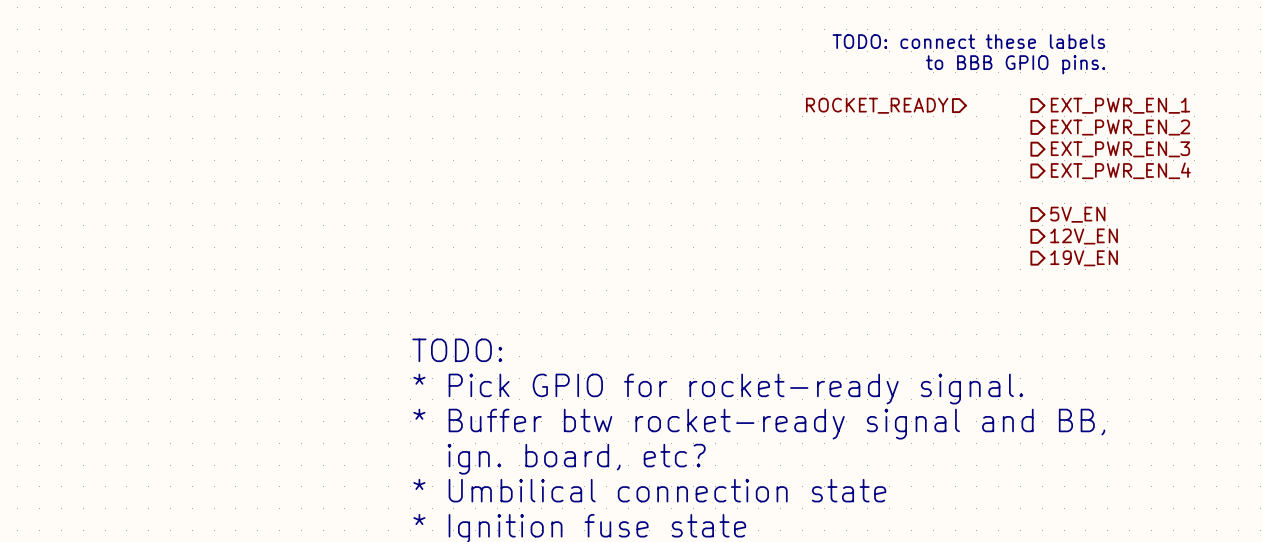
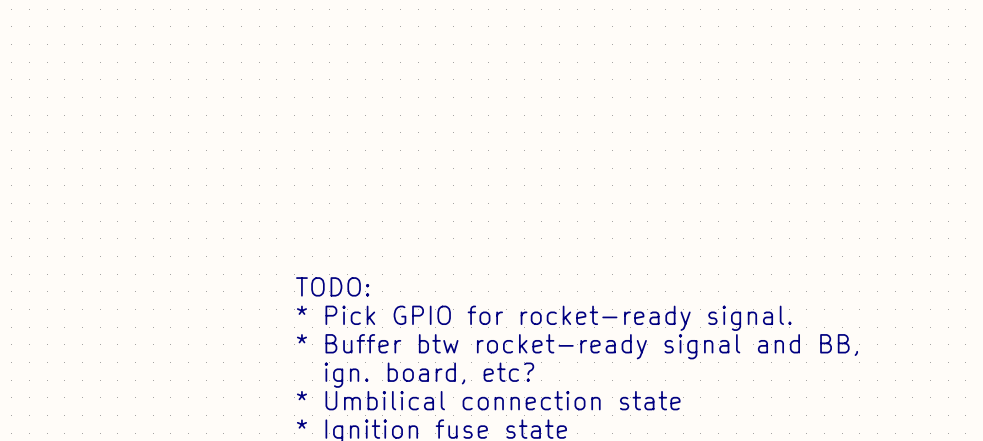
text: TODO: connect these labels (968, 41) -> none
text: to BBB GPIO pins. (1015, 64) -> none
hierarchical label: ROCKET_READY (877, 105) -> none
hierarchical label: EXT_PWR_EN_1 (1120, 105) -> none
hierarchical label: EXT_PWR_EN_2 (1120, 127) -> none
hierarchical label: EXT_PWR_EN_3 (1120, 149) -> none
hierarchical label: EXT_PWR_EN_4 (1120, 170) -> none
hierarchical label: 5V_EN (1077, 214) -> none
hierarchical label: 12V_EN (1084, 236) -> none
hierarchical label: 19V_EN (1084, 258) -> none

